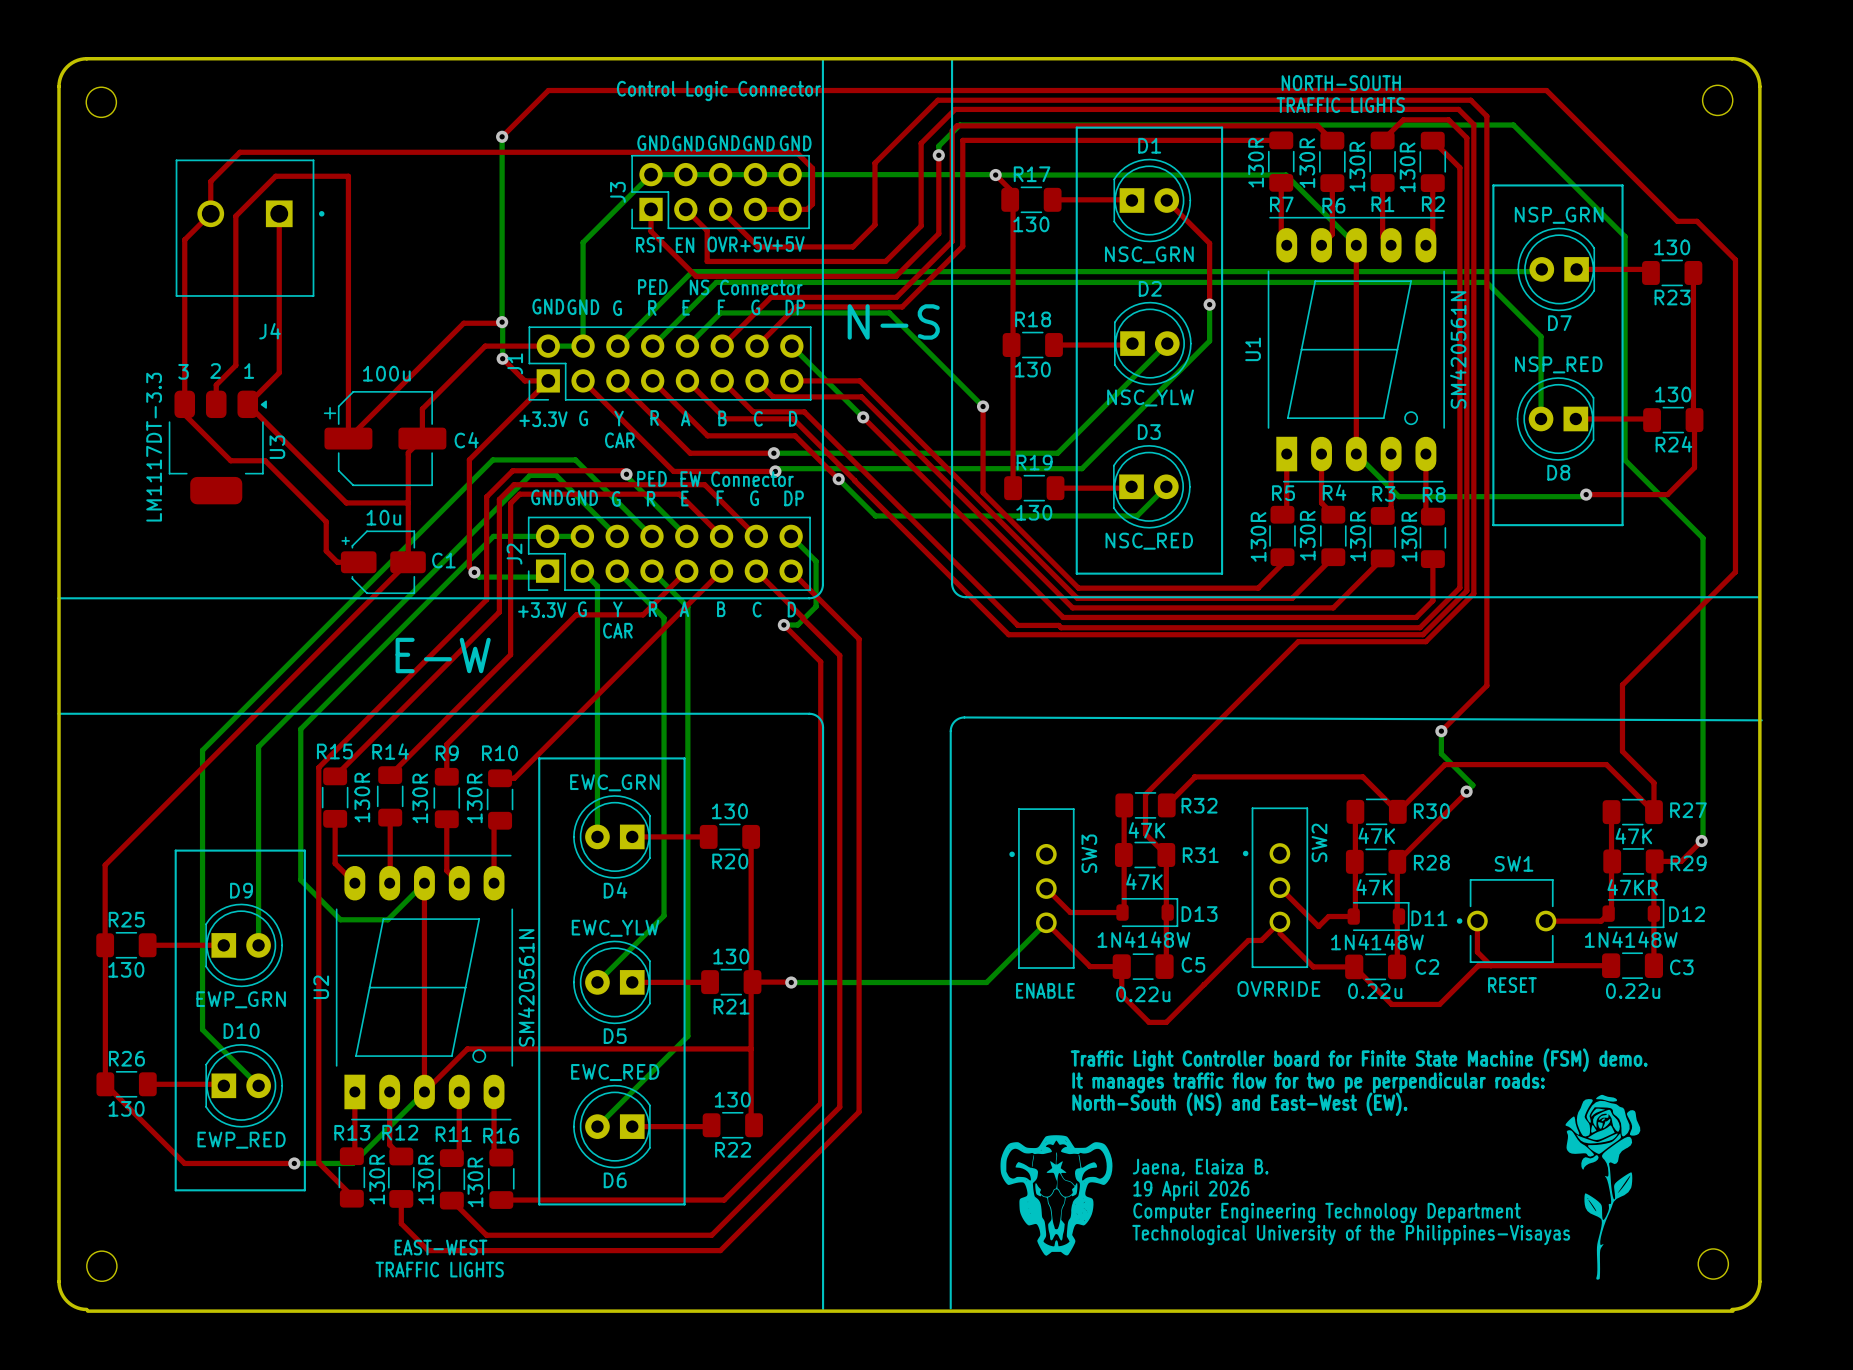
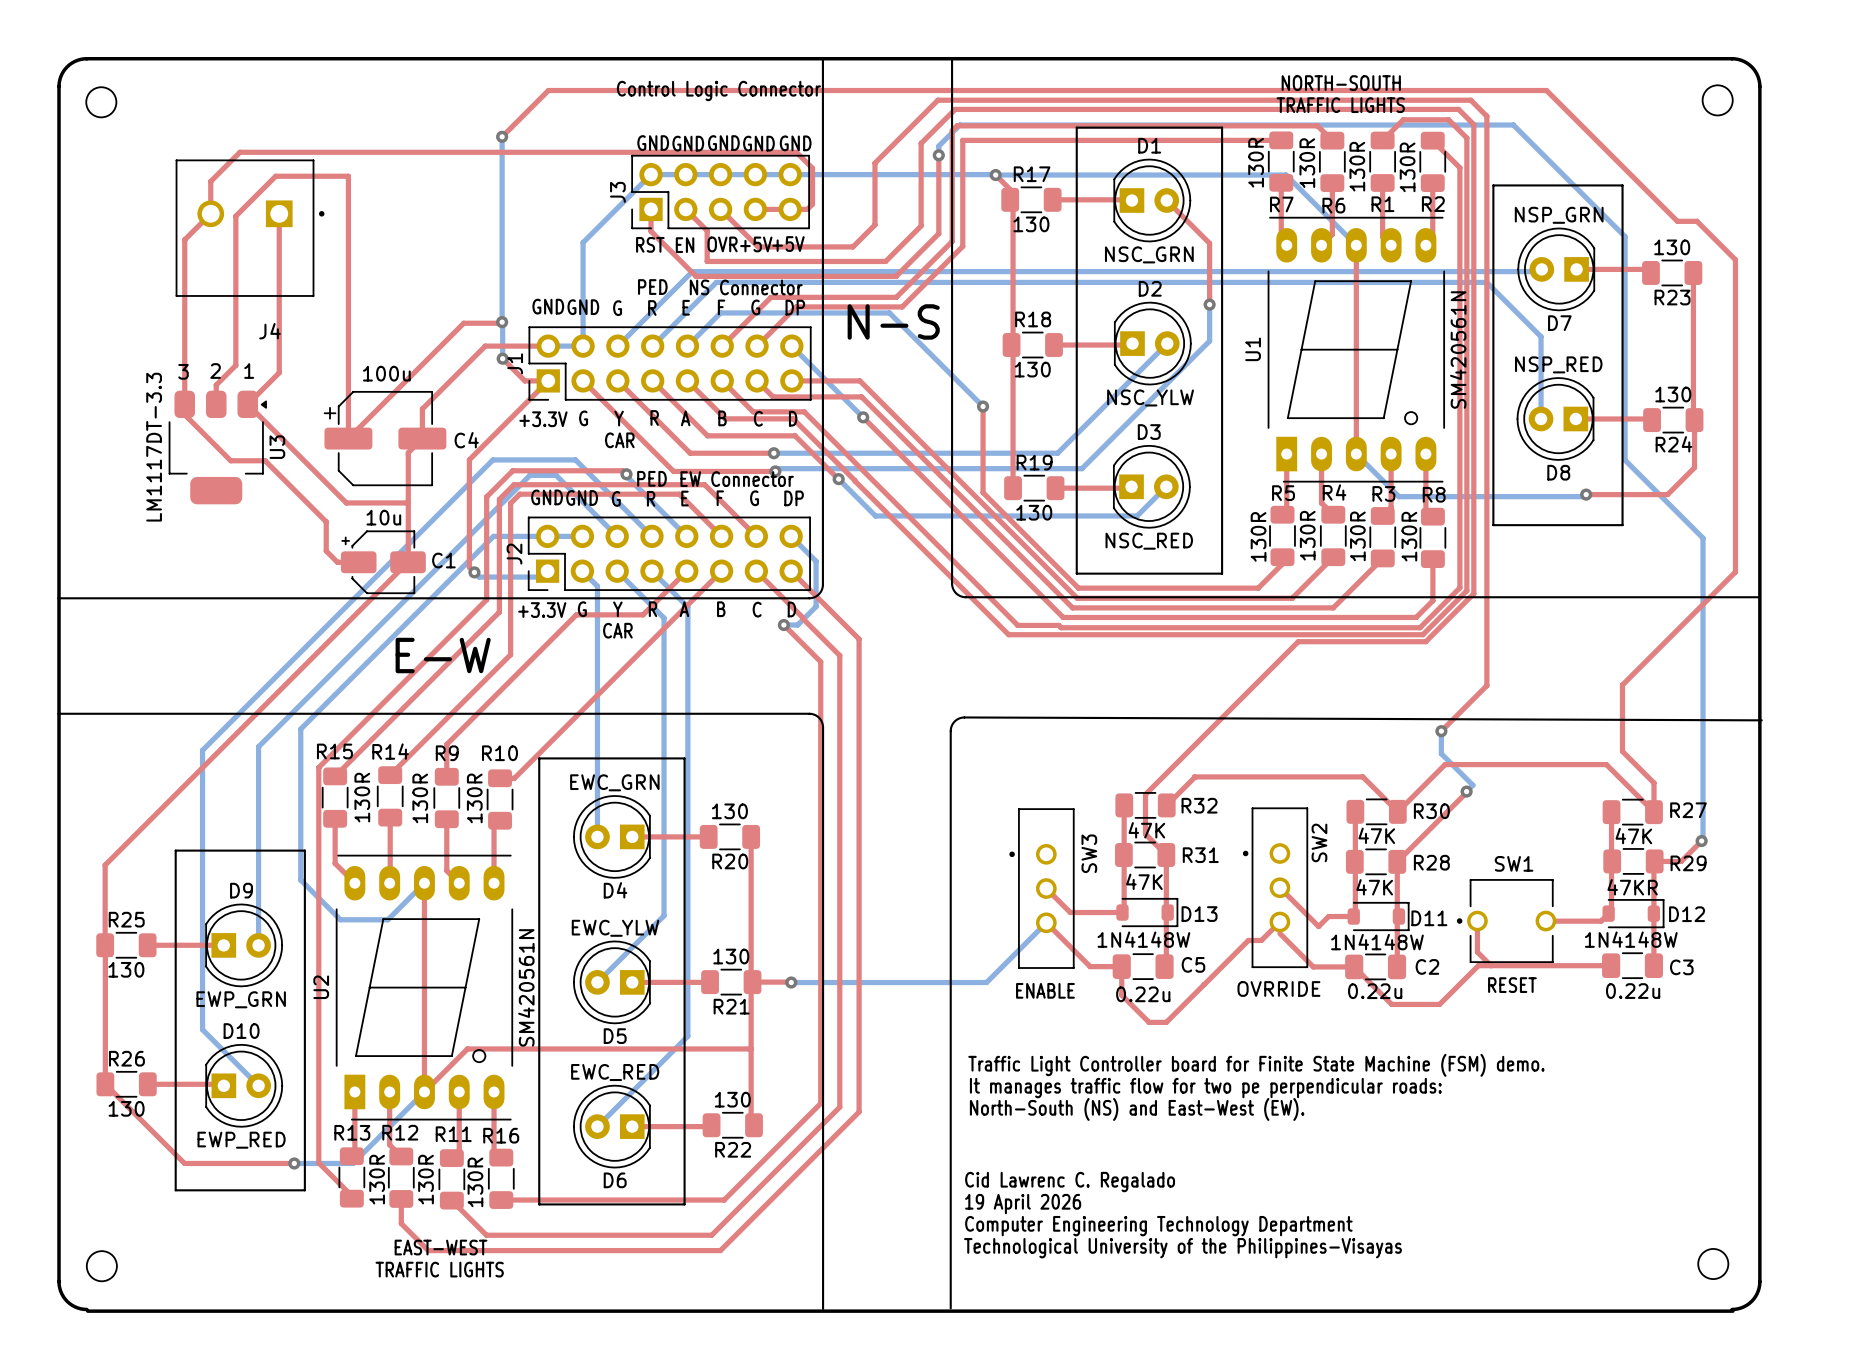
text position: Traffic Light Controller board for Finite State Machine (FSM) demo. (1359, 1060) -> Traffic Light Controller board for Finite State Machine (FSM) demo. (1256, 1065)
text position: It manages traffic flow for two pe perpendicular roads: (1308, 1082) -> It manages traffic flow for two pe perpendicular roads: (1205, 1088)
drawing: [1565, 1094, 1641, 1280] -> none
text position: North-South (NS) and East-West (EW). (1239, 1104) -> North-South (NS) and East-West (EW). (1137, 1109)
drawing: [1000, 1135, 1113, 1256] -> none
text: Jaena, Elaiza B. (1200, 1167) -> none
text: none -> Cid Lawrenc C. Regalado (1070, 1182)
text position: 19 April 2026 (1191, 1190) -> 19 April 2026 (1023, 1204)
text position: Computer Engineering Technology Department (1327, 1212) -> Computer Engineering Technology Department (1158, 1226)
text position: Technological University of the Philippines-Visayas (1351, 1235) -> Technological University of the Philippines-Visayas (1182, 1248)

